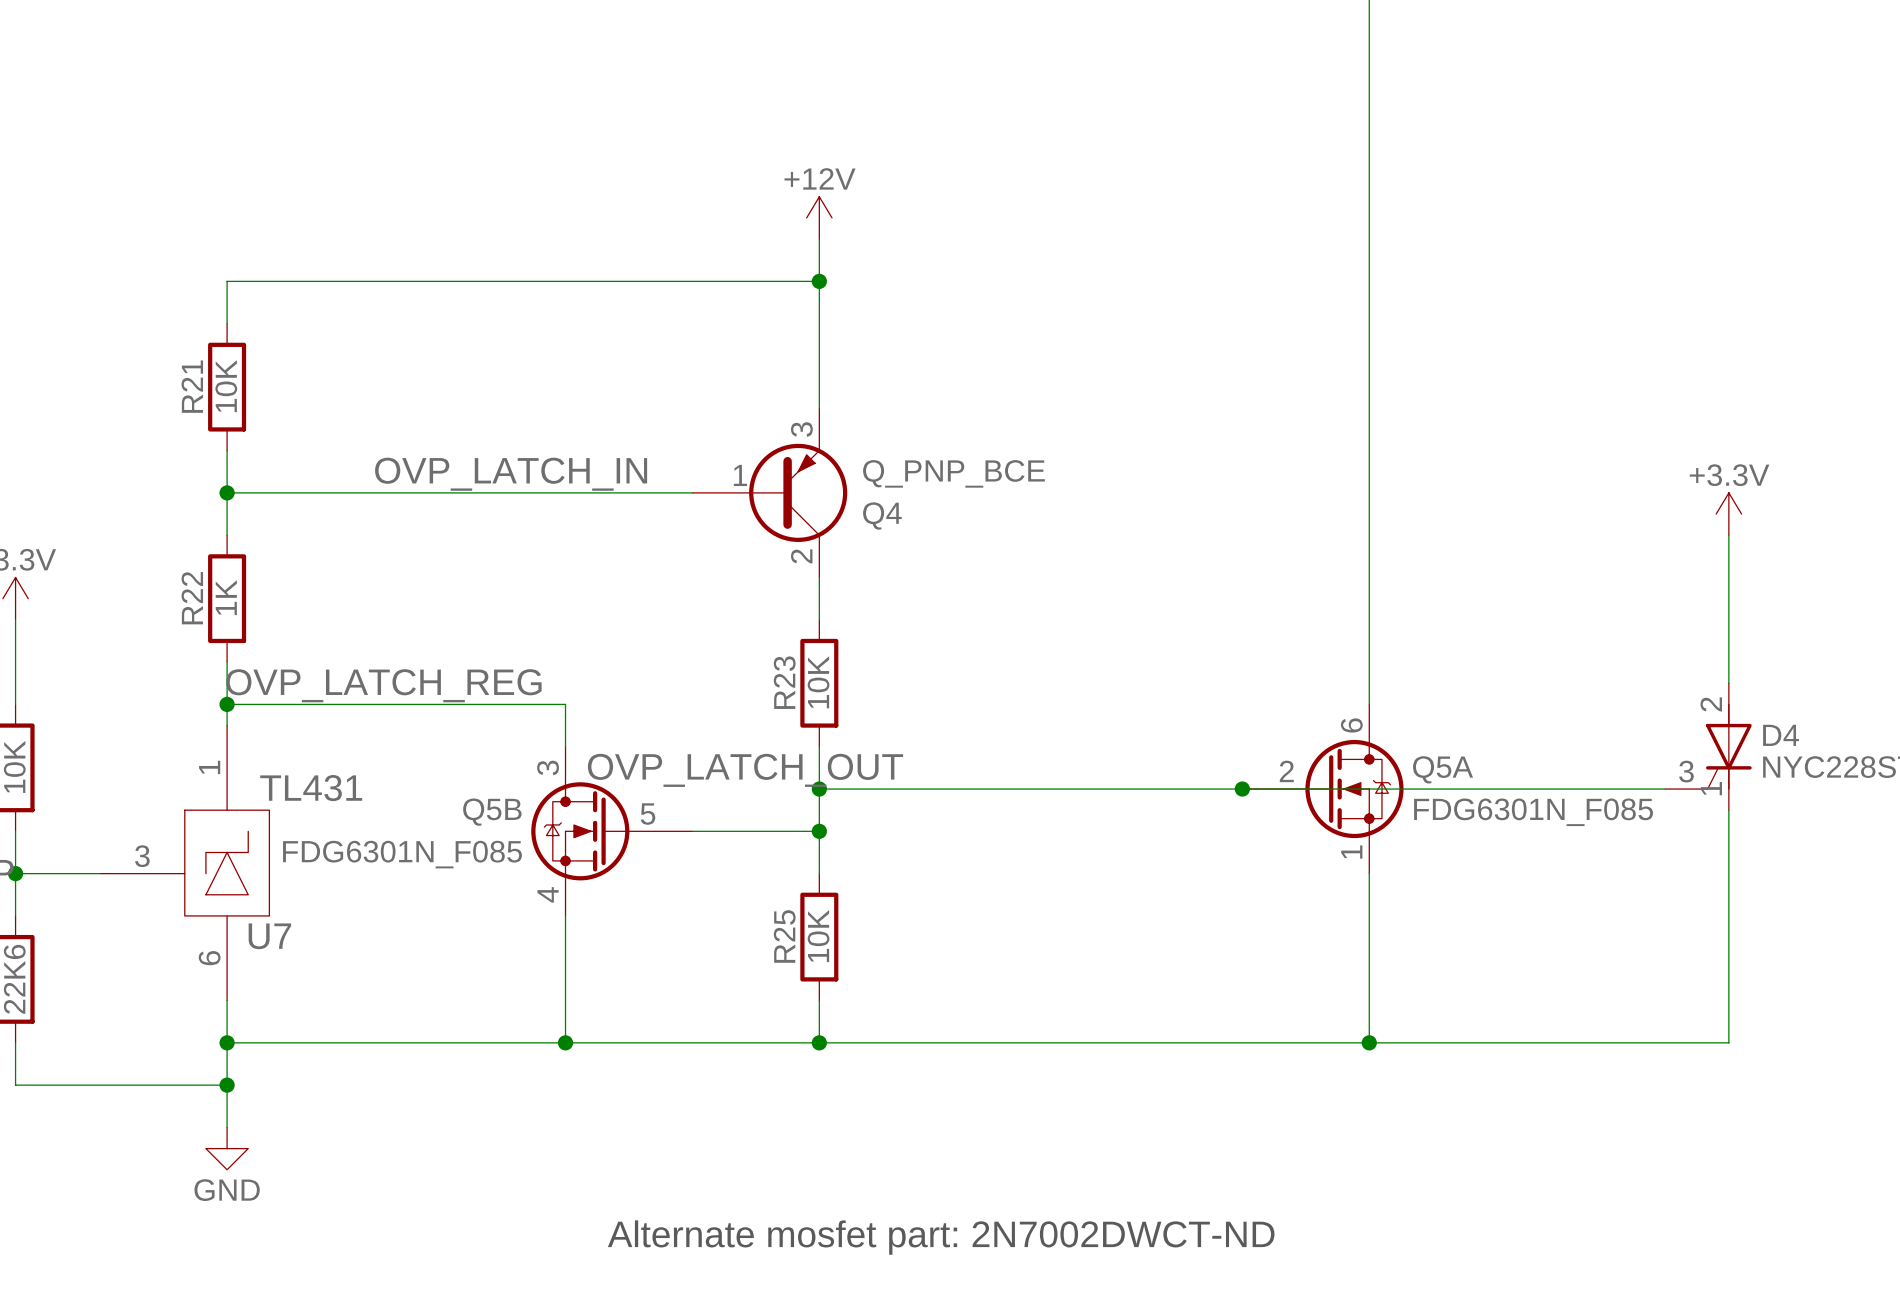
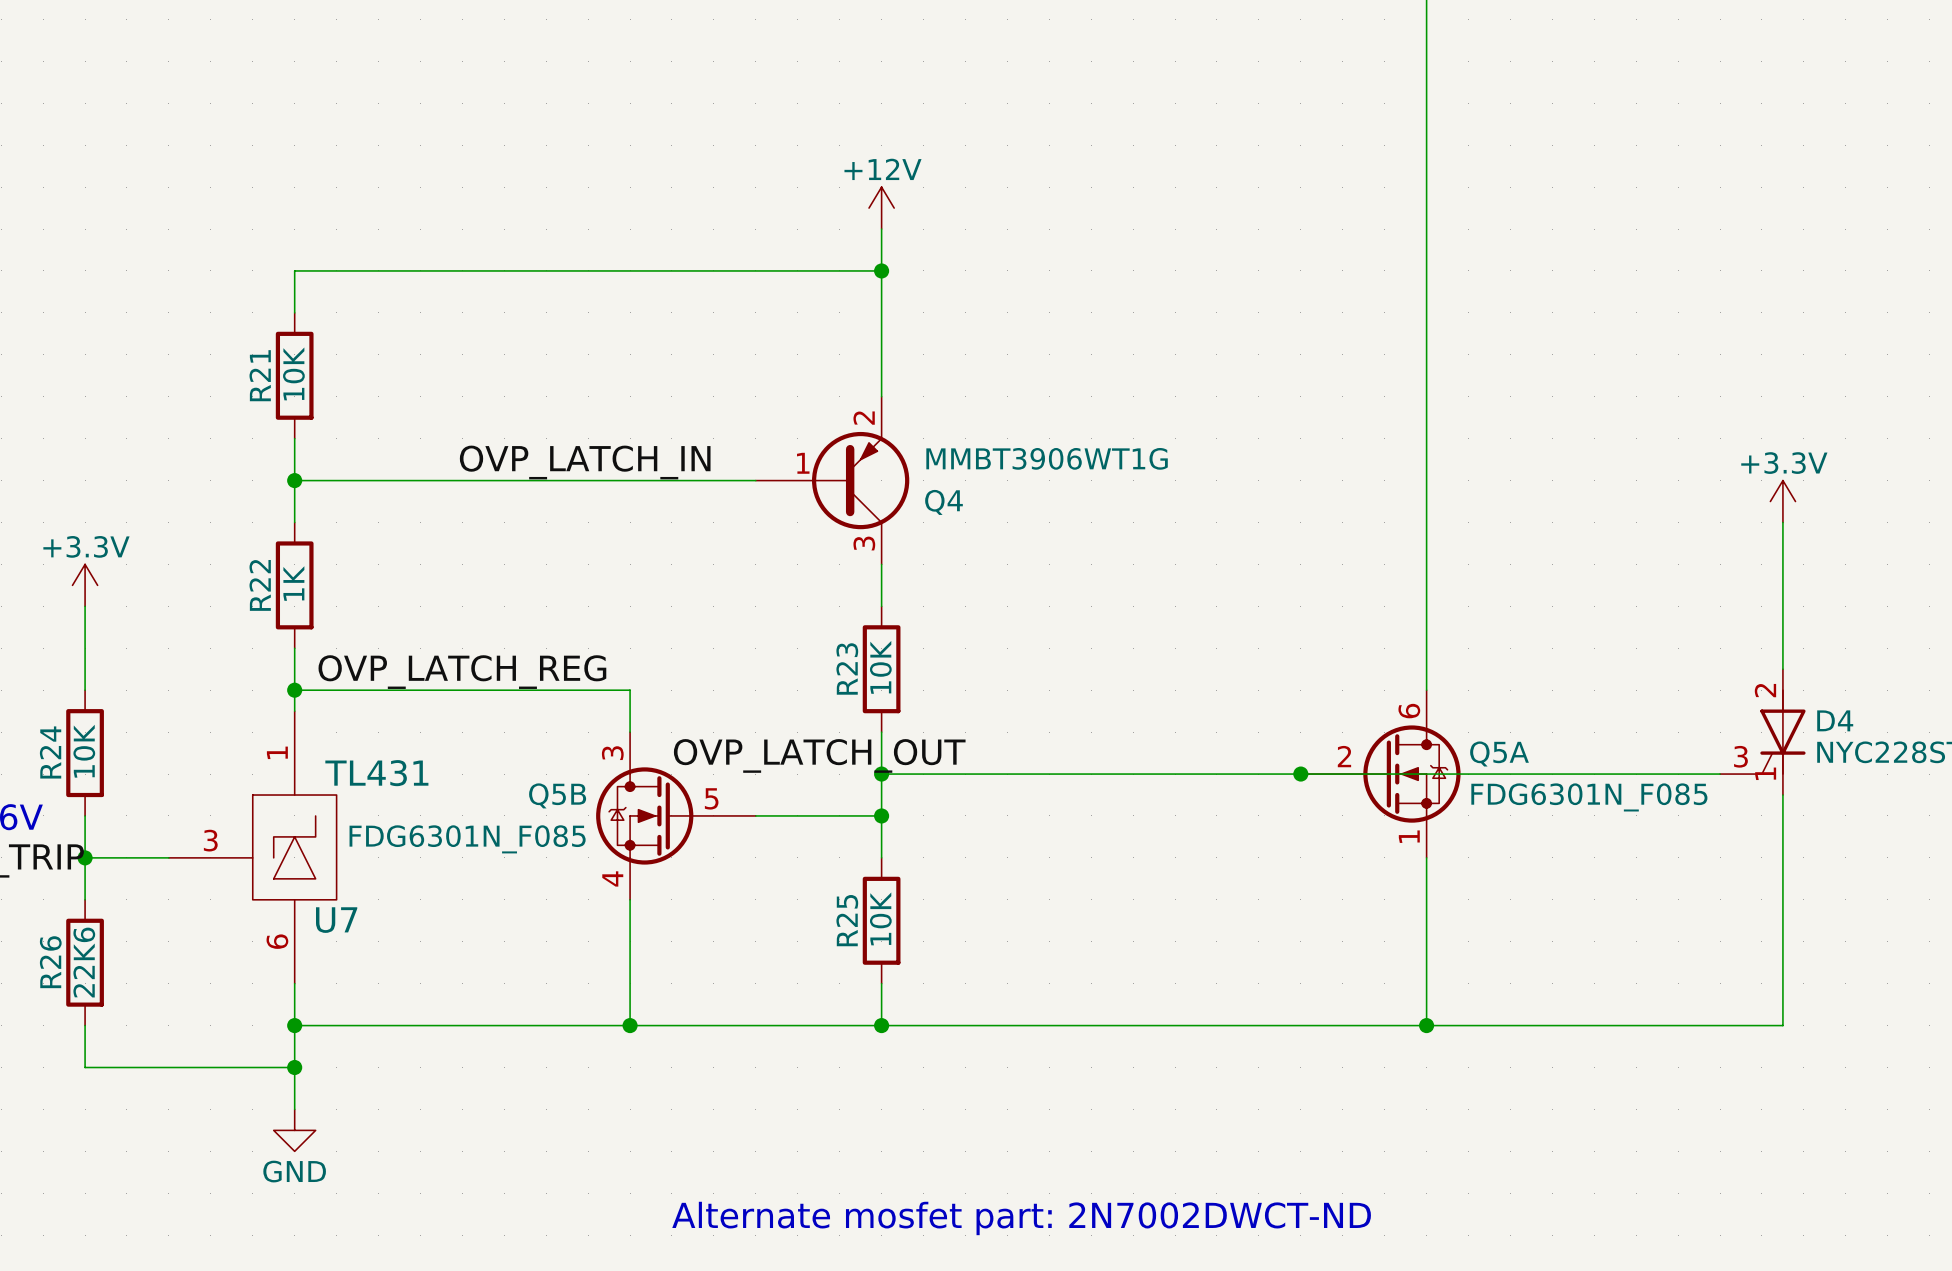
Q4 pin number: 3 (801, 429) -> 2 (864, 418)
Q4 value: Q_PNP_BCE (953, 473) -> MMBT3906WT1G (1047, 458)
Q4 pin number: 2 (801, 556) -> 3 (864, 543)

